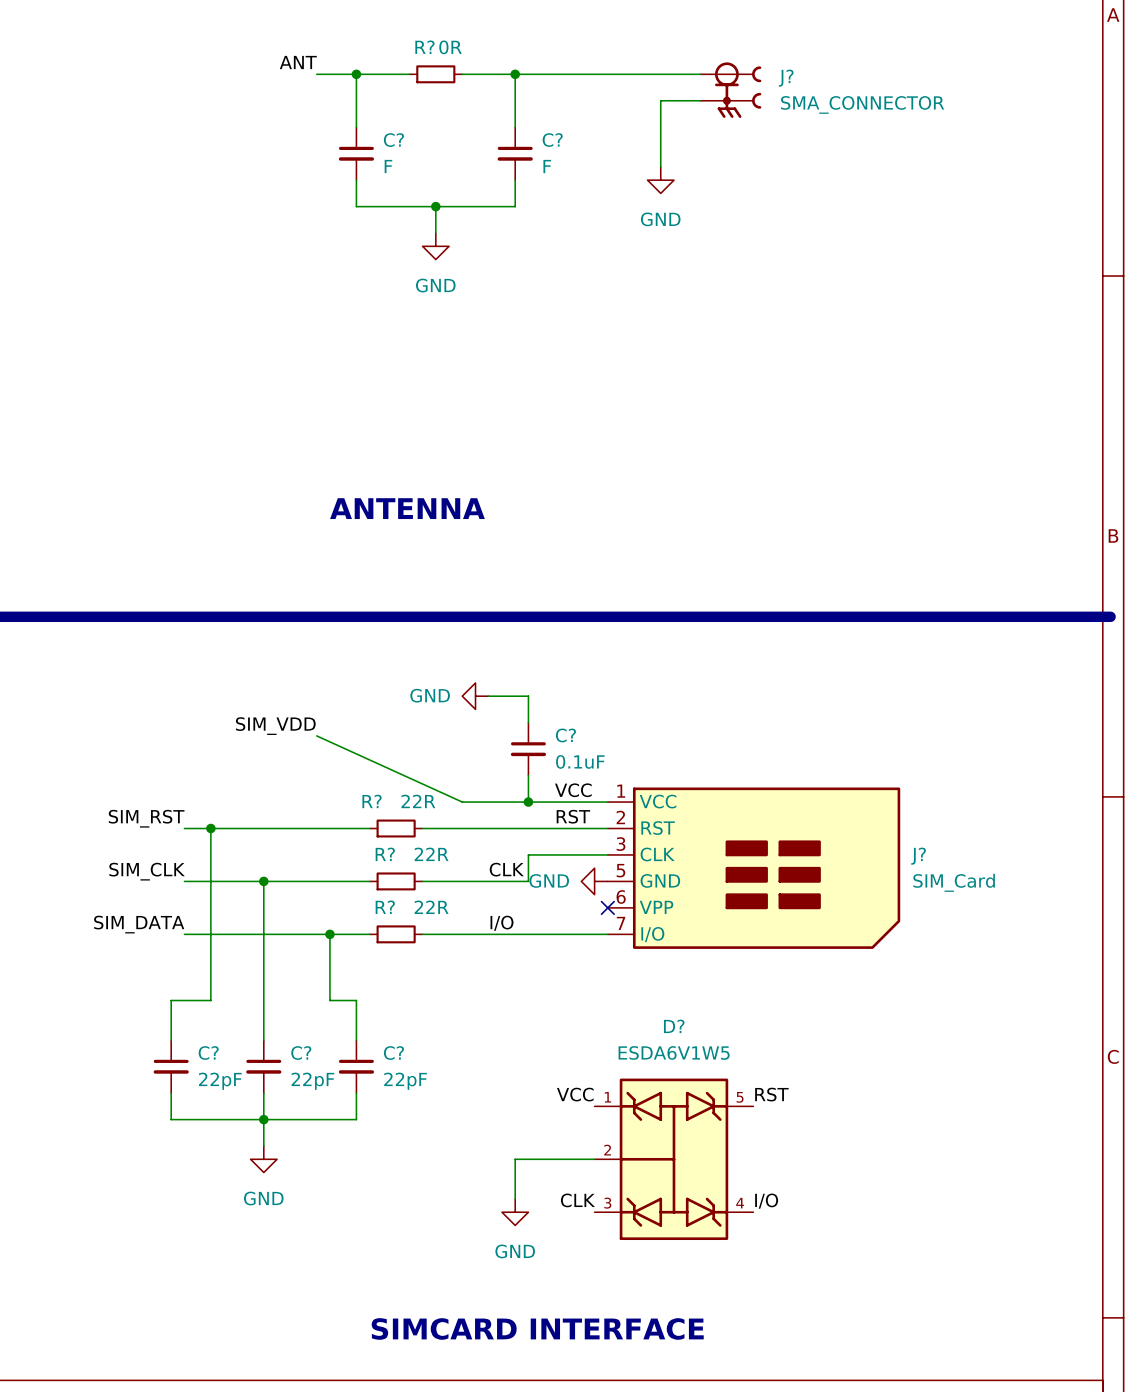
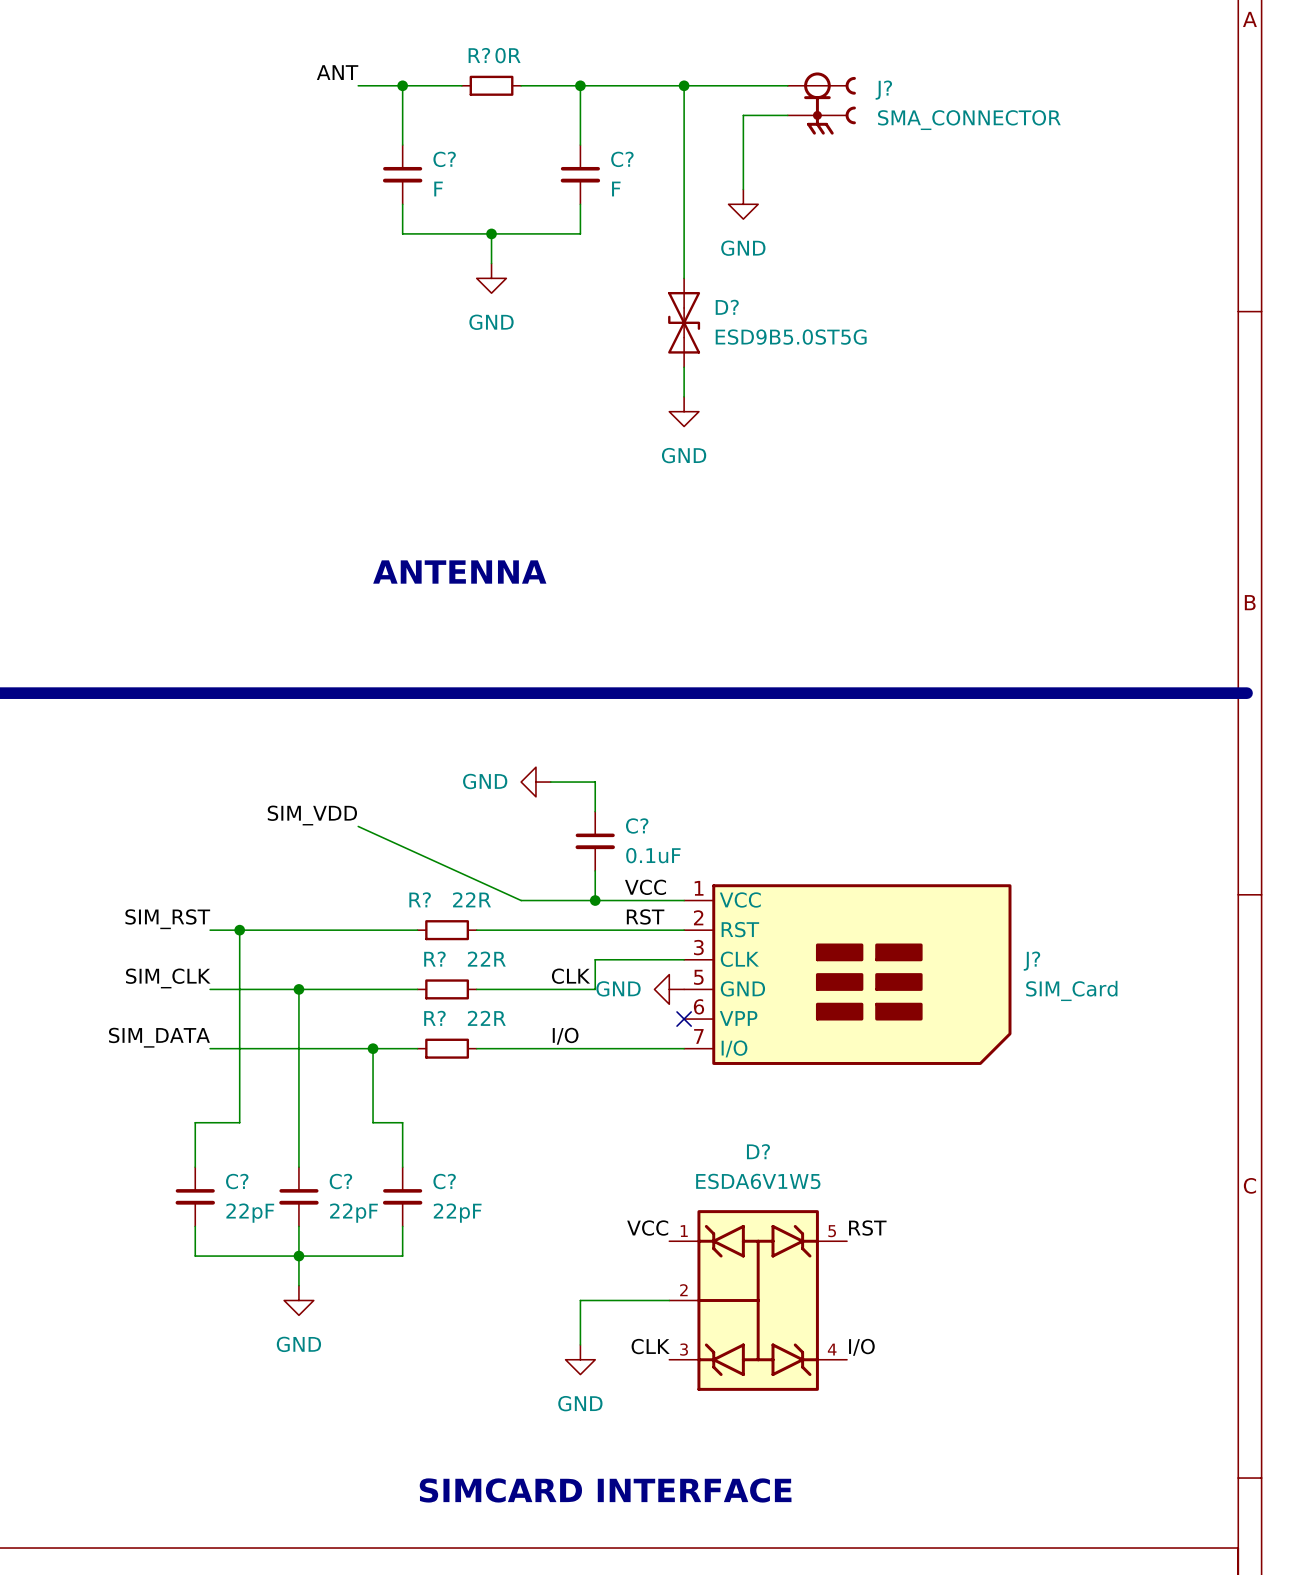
wire: none -> (684, 85) (684, 278)
junction: none -> (684, 85)
D?: none -> ESD9B5.0ST5G (684, 322)
wire: none -> (684, 367) (684, 396)
power symbol: none -> GND (684, 411)

